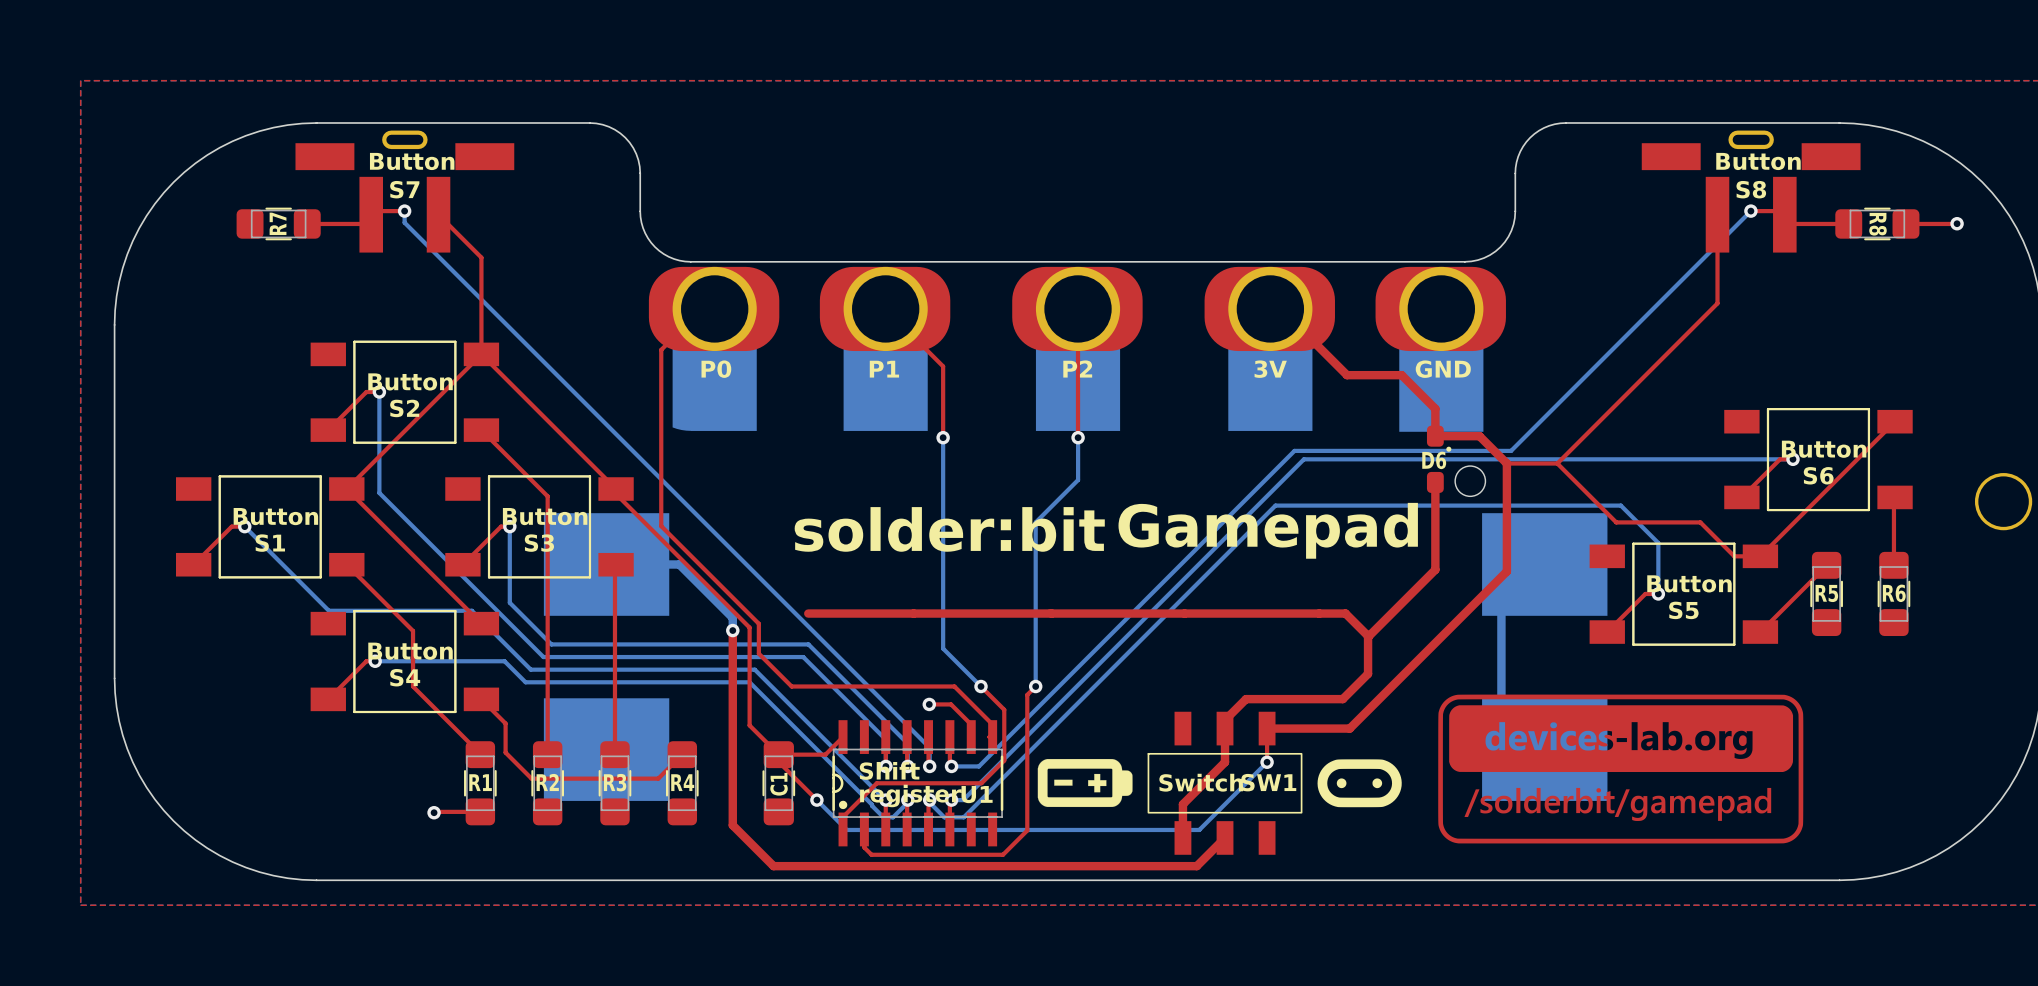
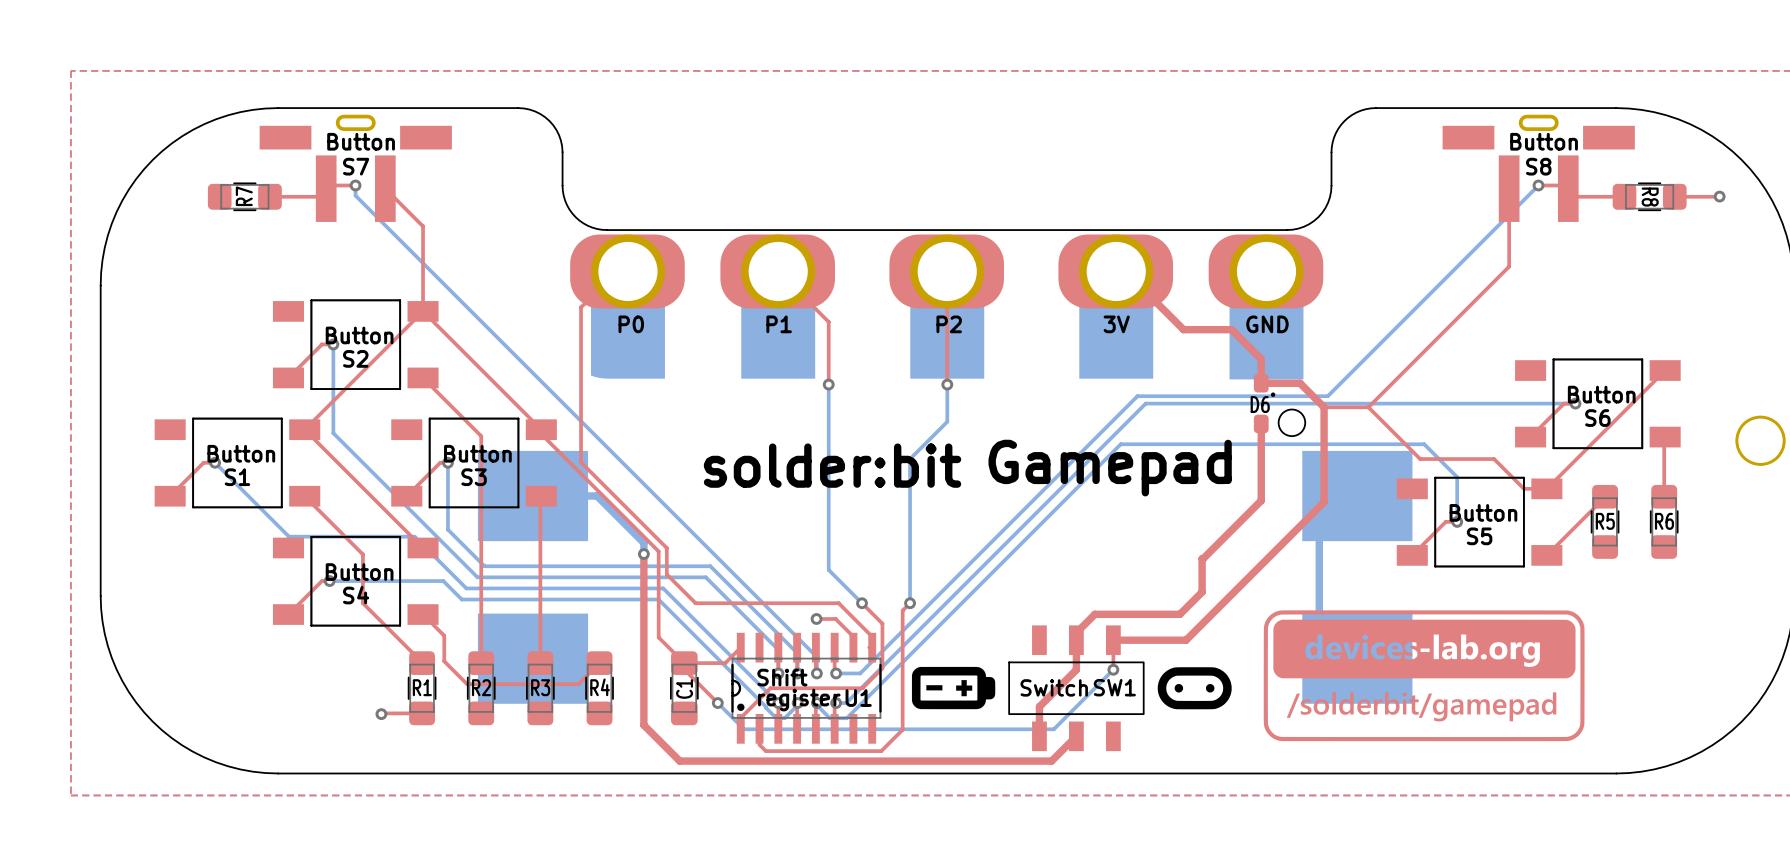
top track: (808, 613) (1345, 613) (1368, 636) -> none

